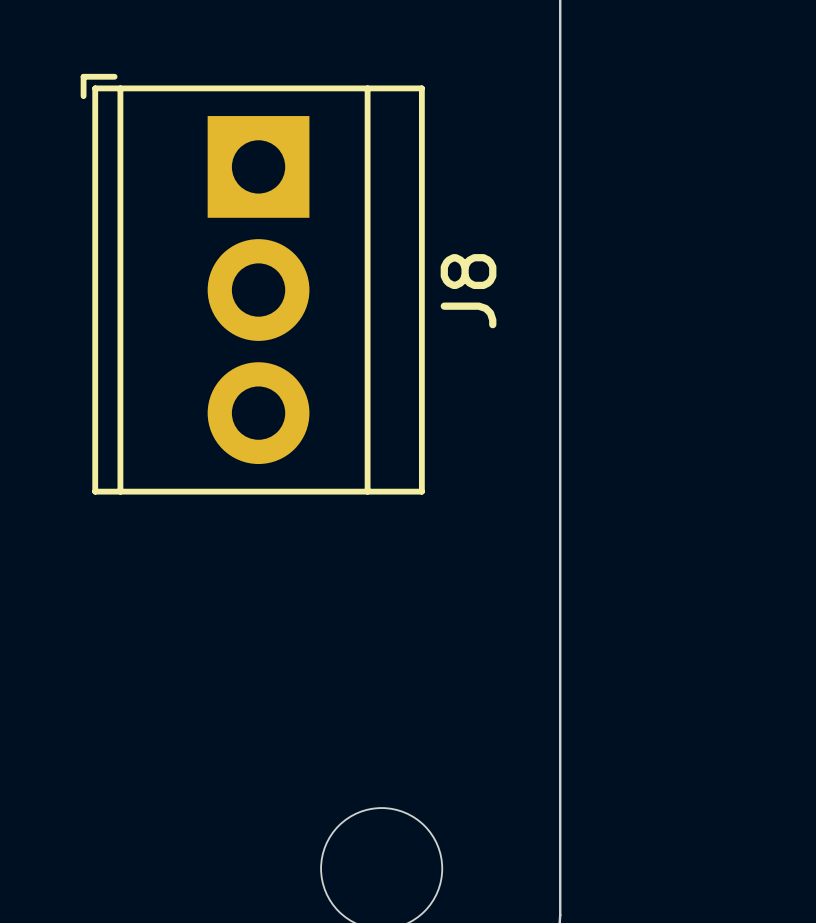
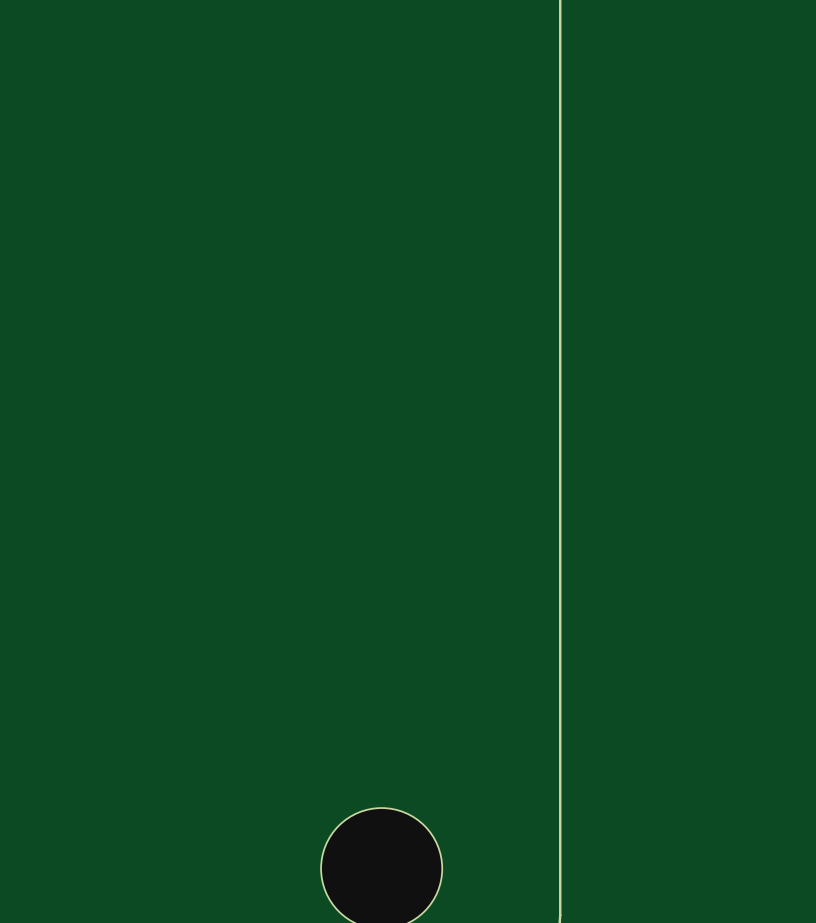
J8: (252, 284) -> none

